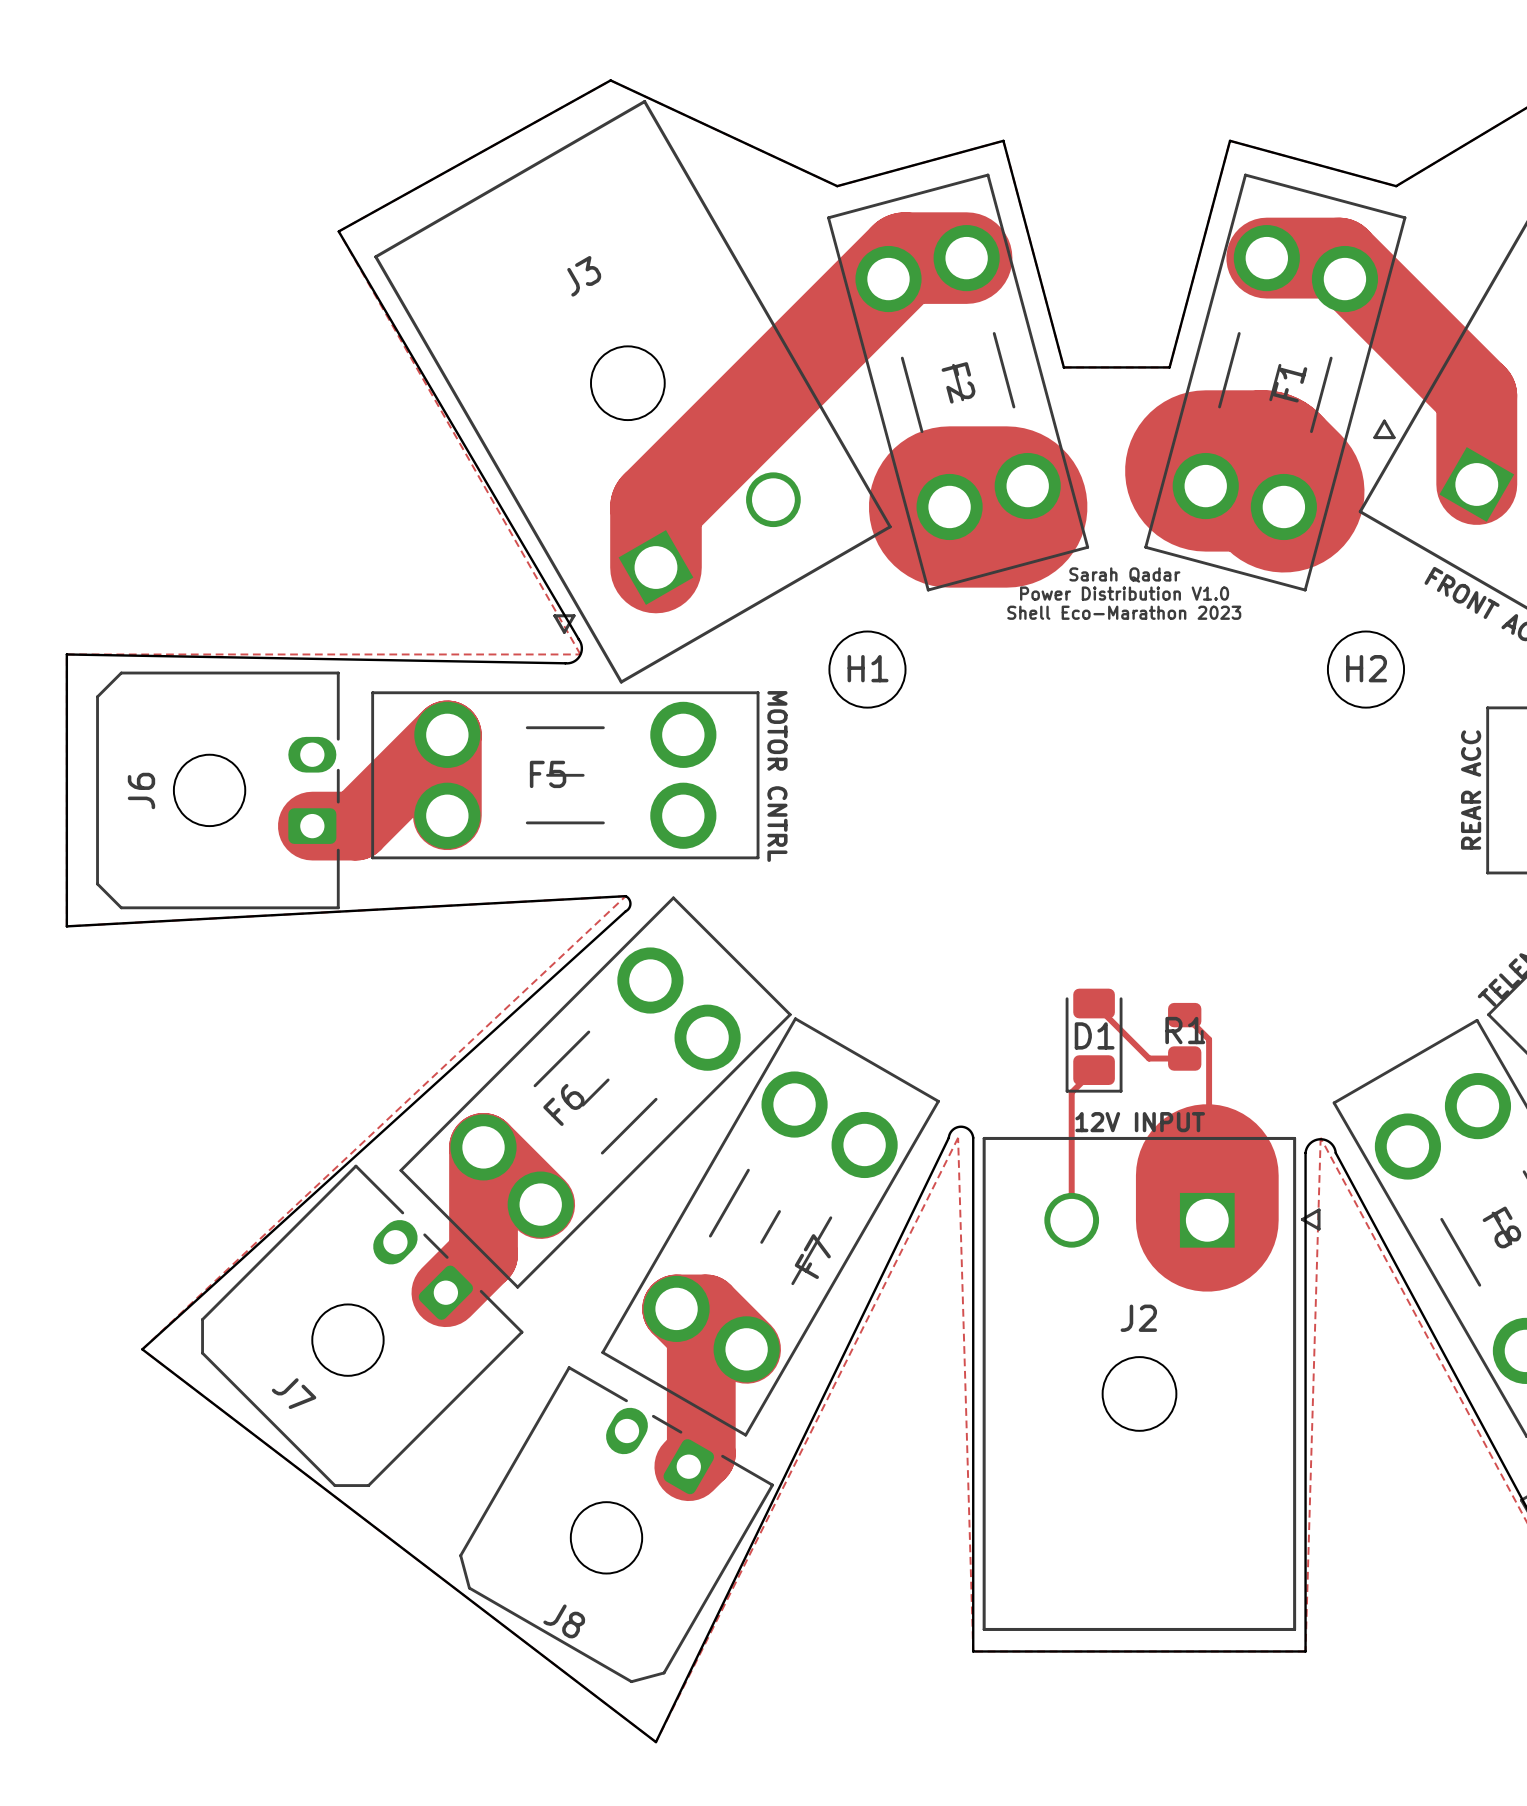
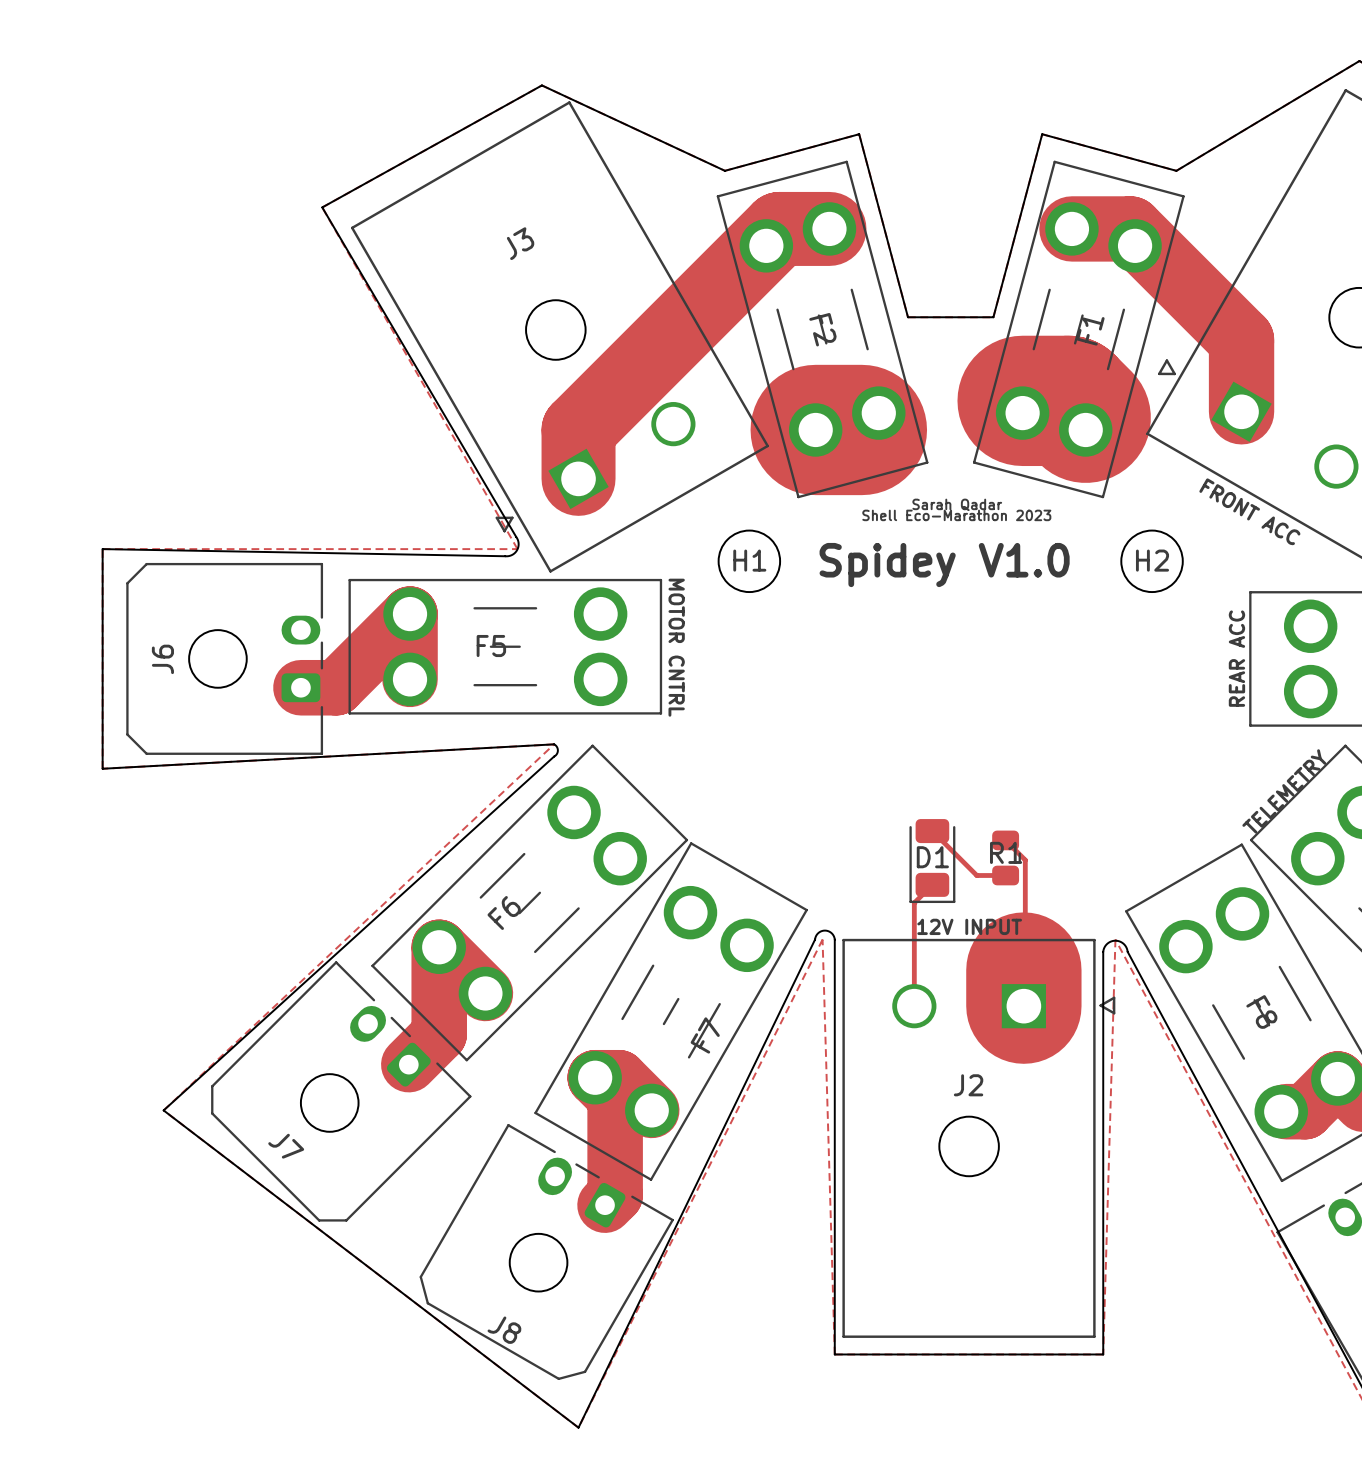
text: Sarah Qadar (1124, 575) -> none
text: Power Distribution V1.0 (1124, 593) -> Sarah Qadar (957, 504)
text: none -> Spidey V1.0 (944, 565)

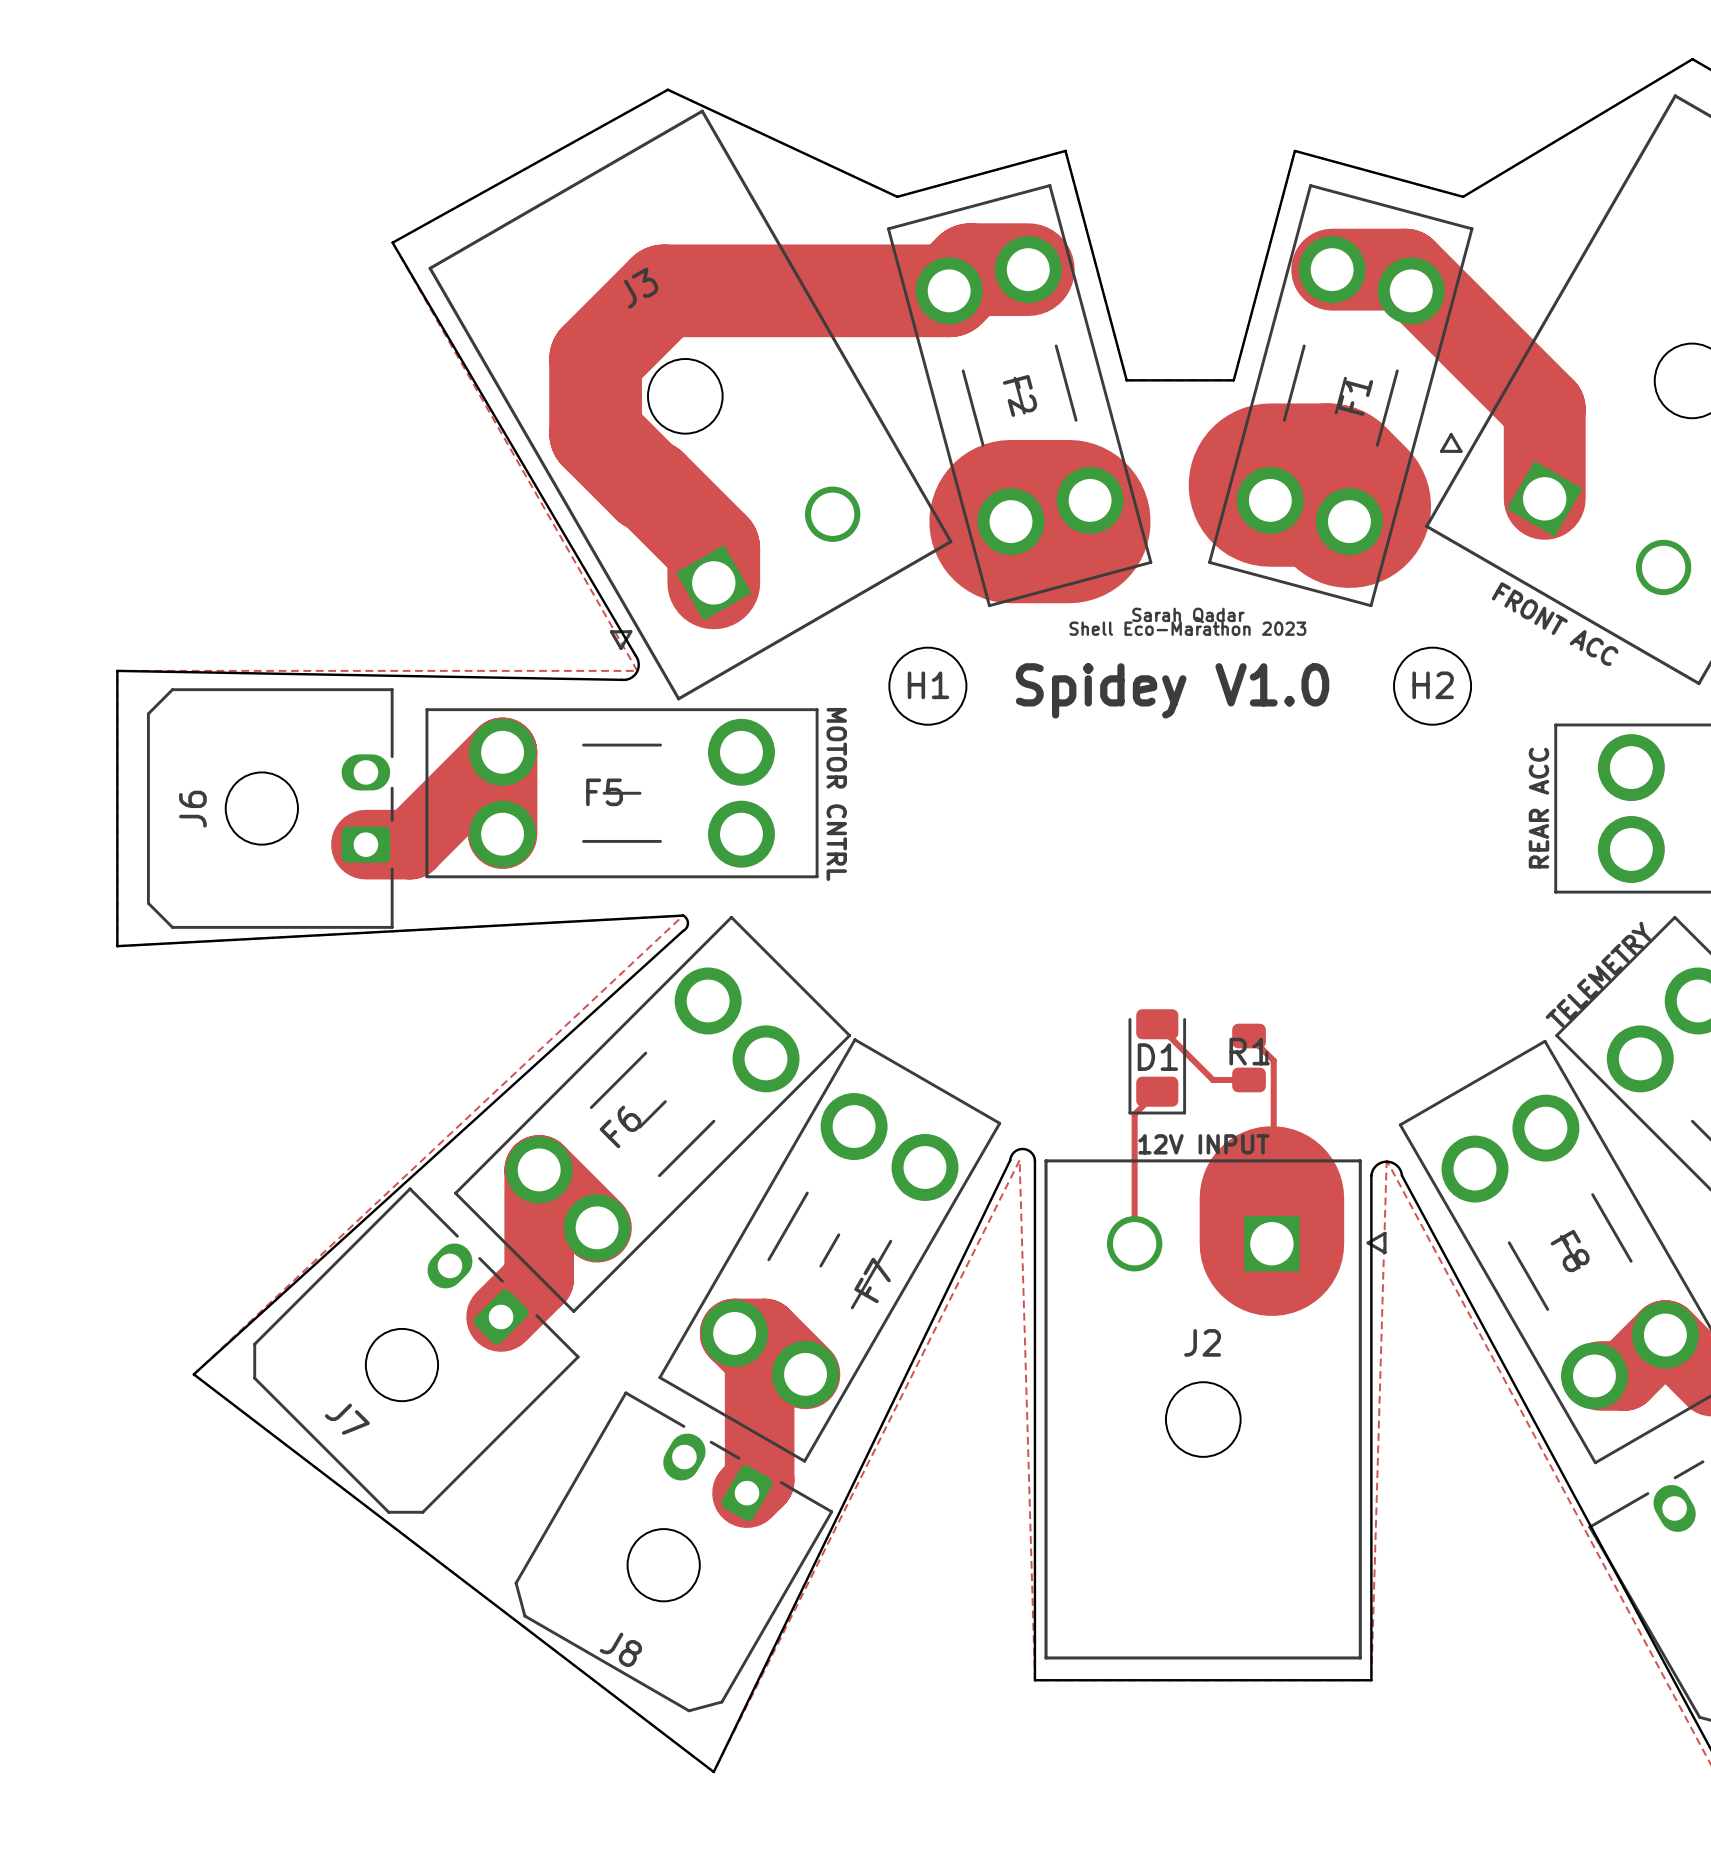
track: (783, 228) (779, 228) (578, 429) (578, 451) -> (970, 269) (949, 290) (663, 290) (595, 359) (595, 433) (713, 548)

